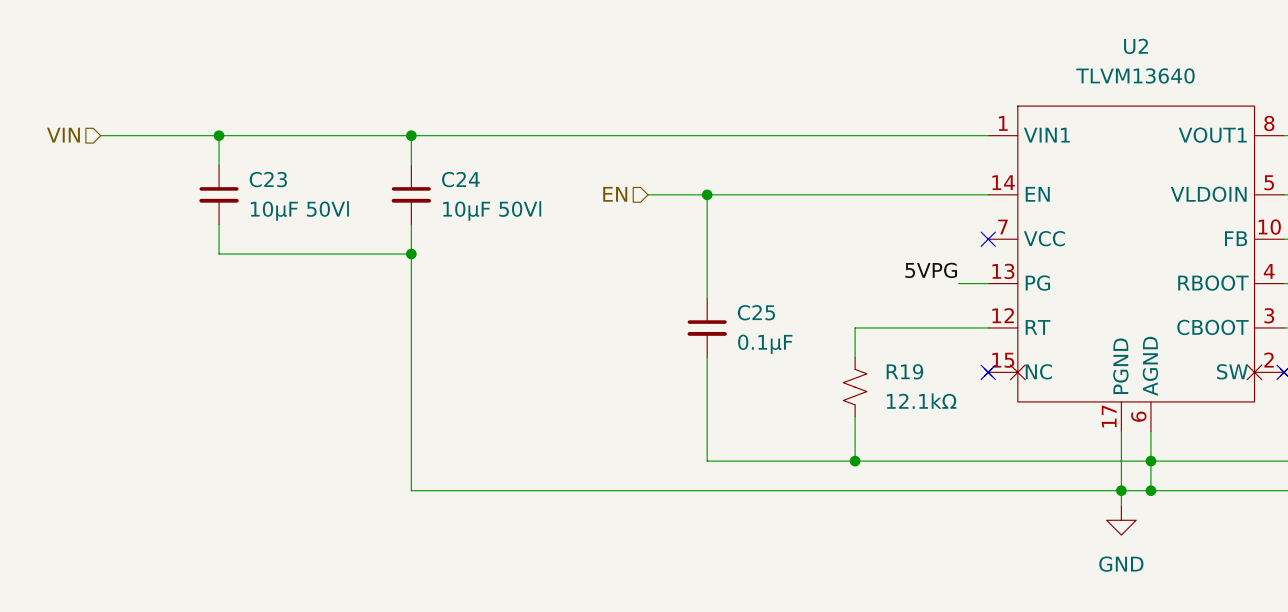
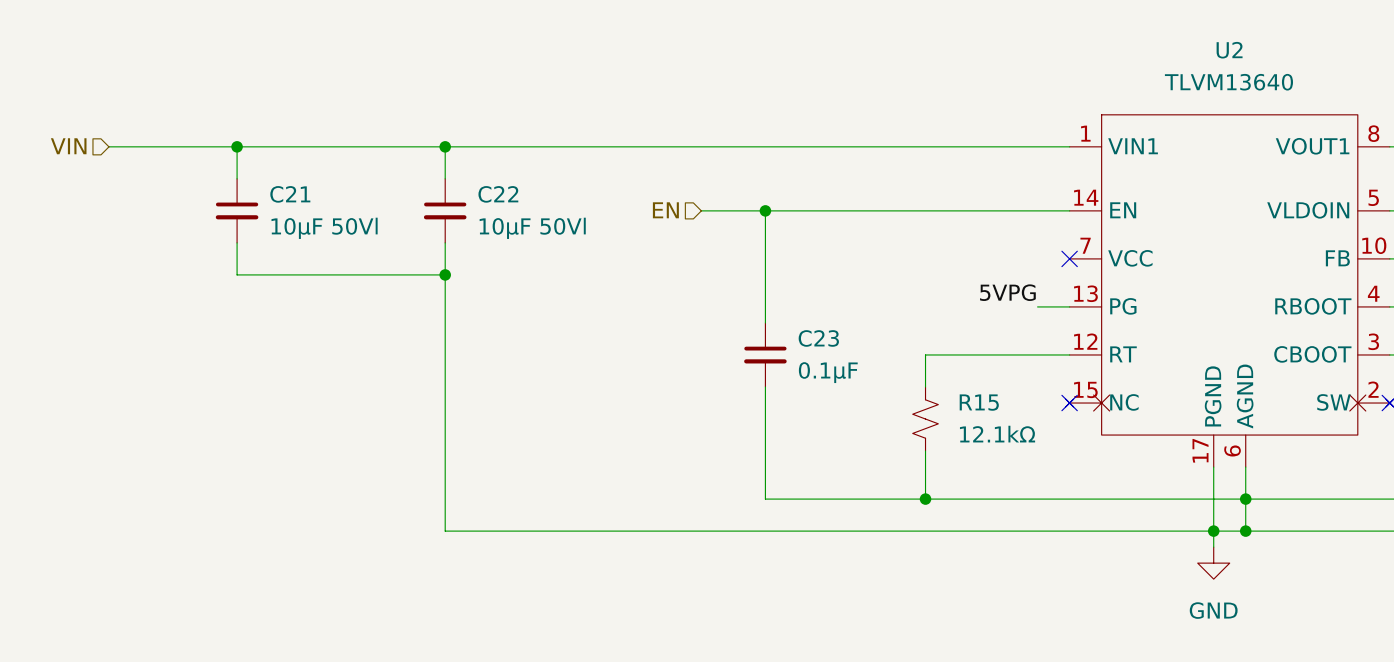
C23 name: C23 (268, 179) -> C21 (290, 194)
C24 name: C24 (460, 179) -> C22 (498, 194)
C25 name: C25 (756, 312) -> C23 (818, 338)
R19 name: R19 (904, 371) -> R15 (979, 402)

